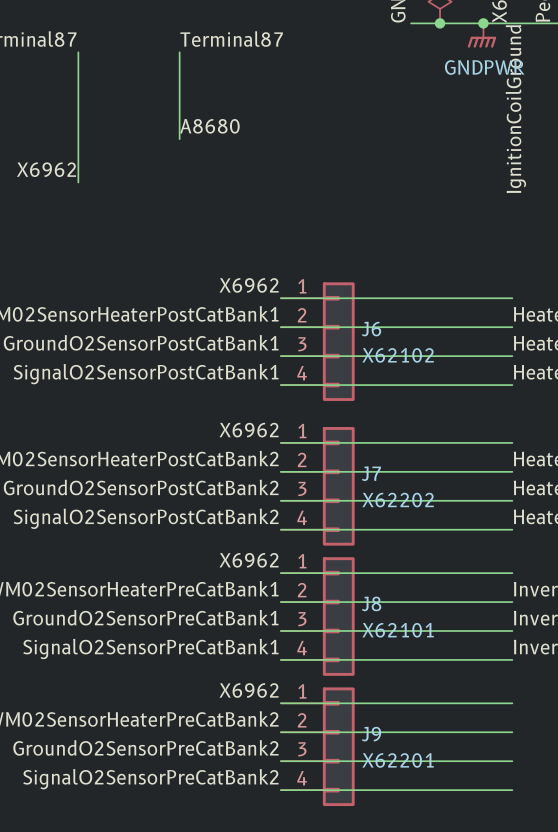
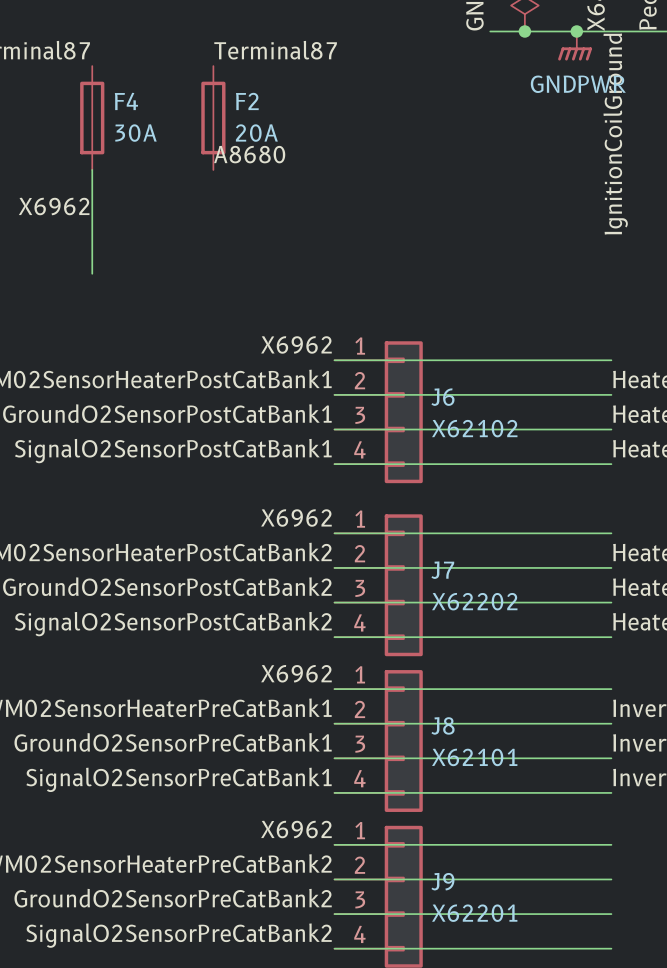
F4: none -> 30A (92, 118)
F2: none -> 20A (213, 118)
wire: none -> (92, 221) (92, 273)

